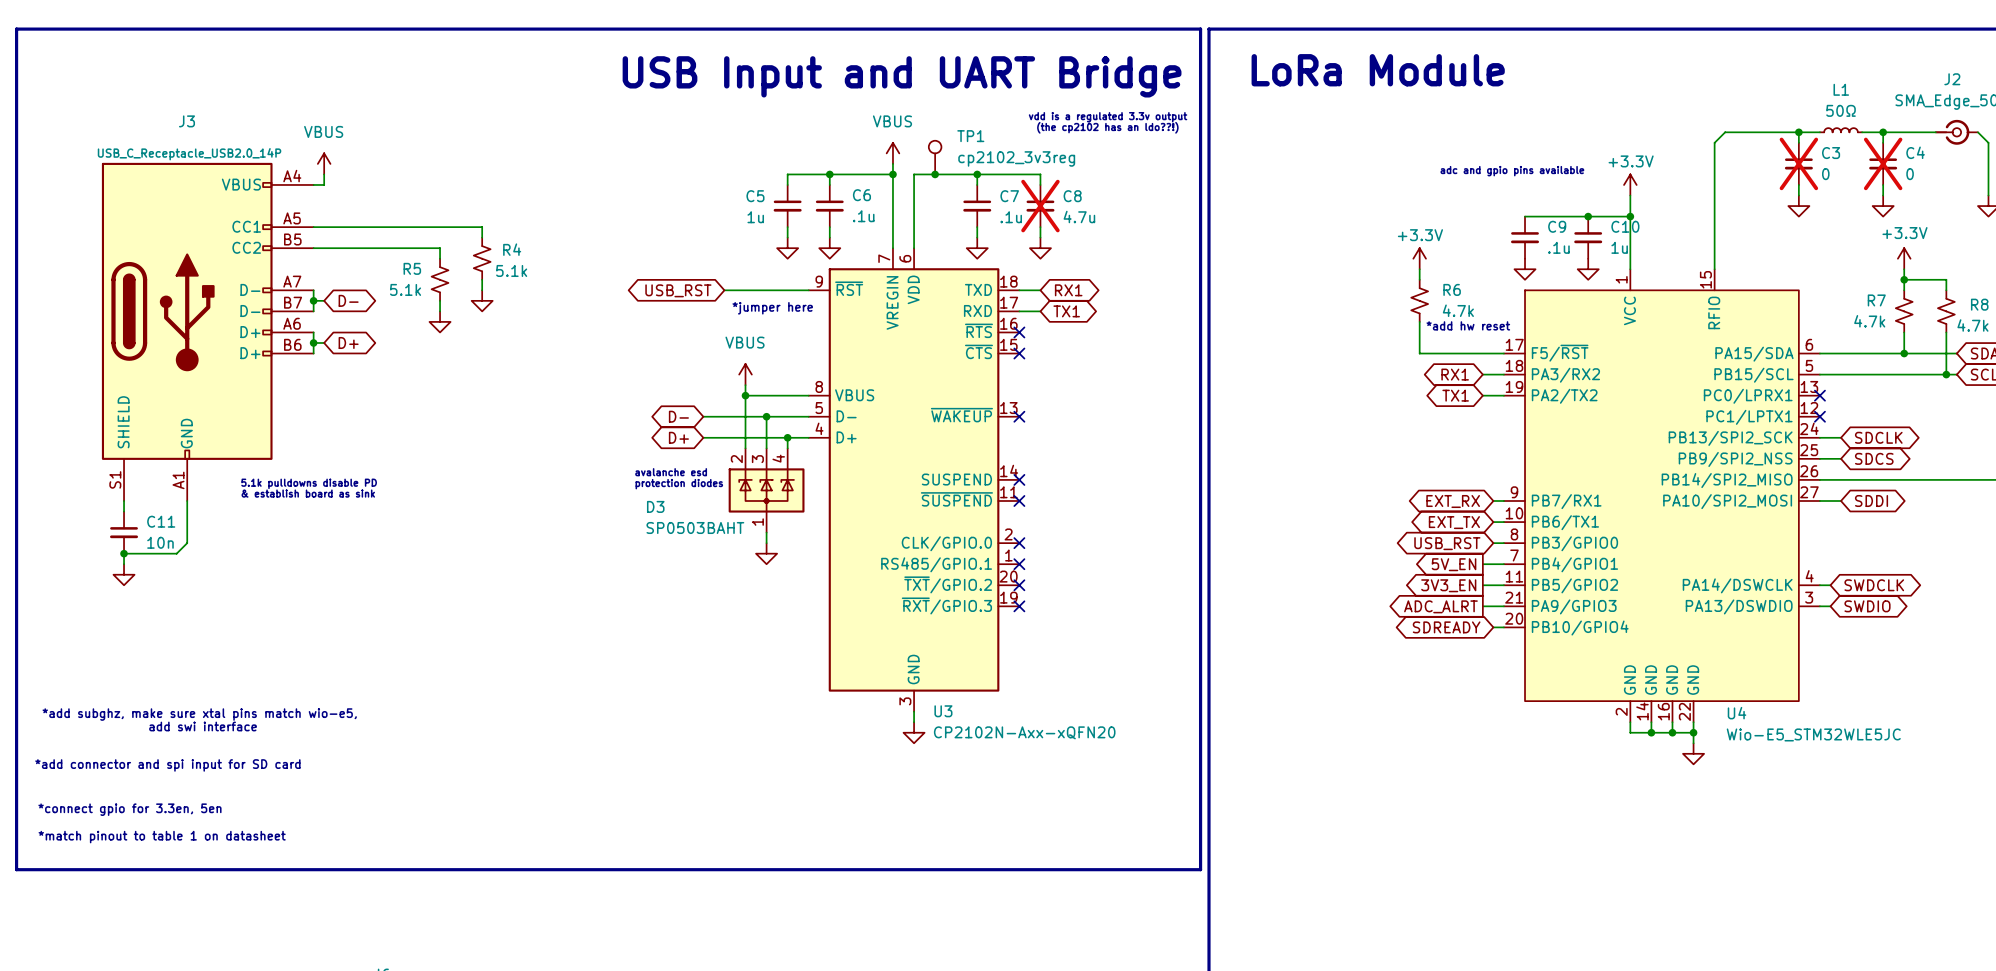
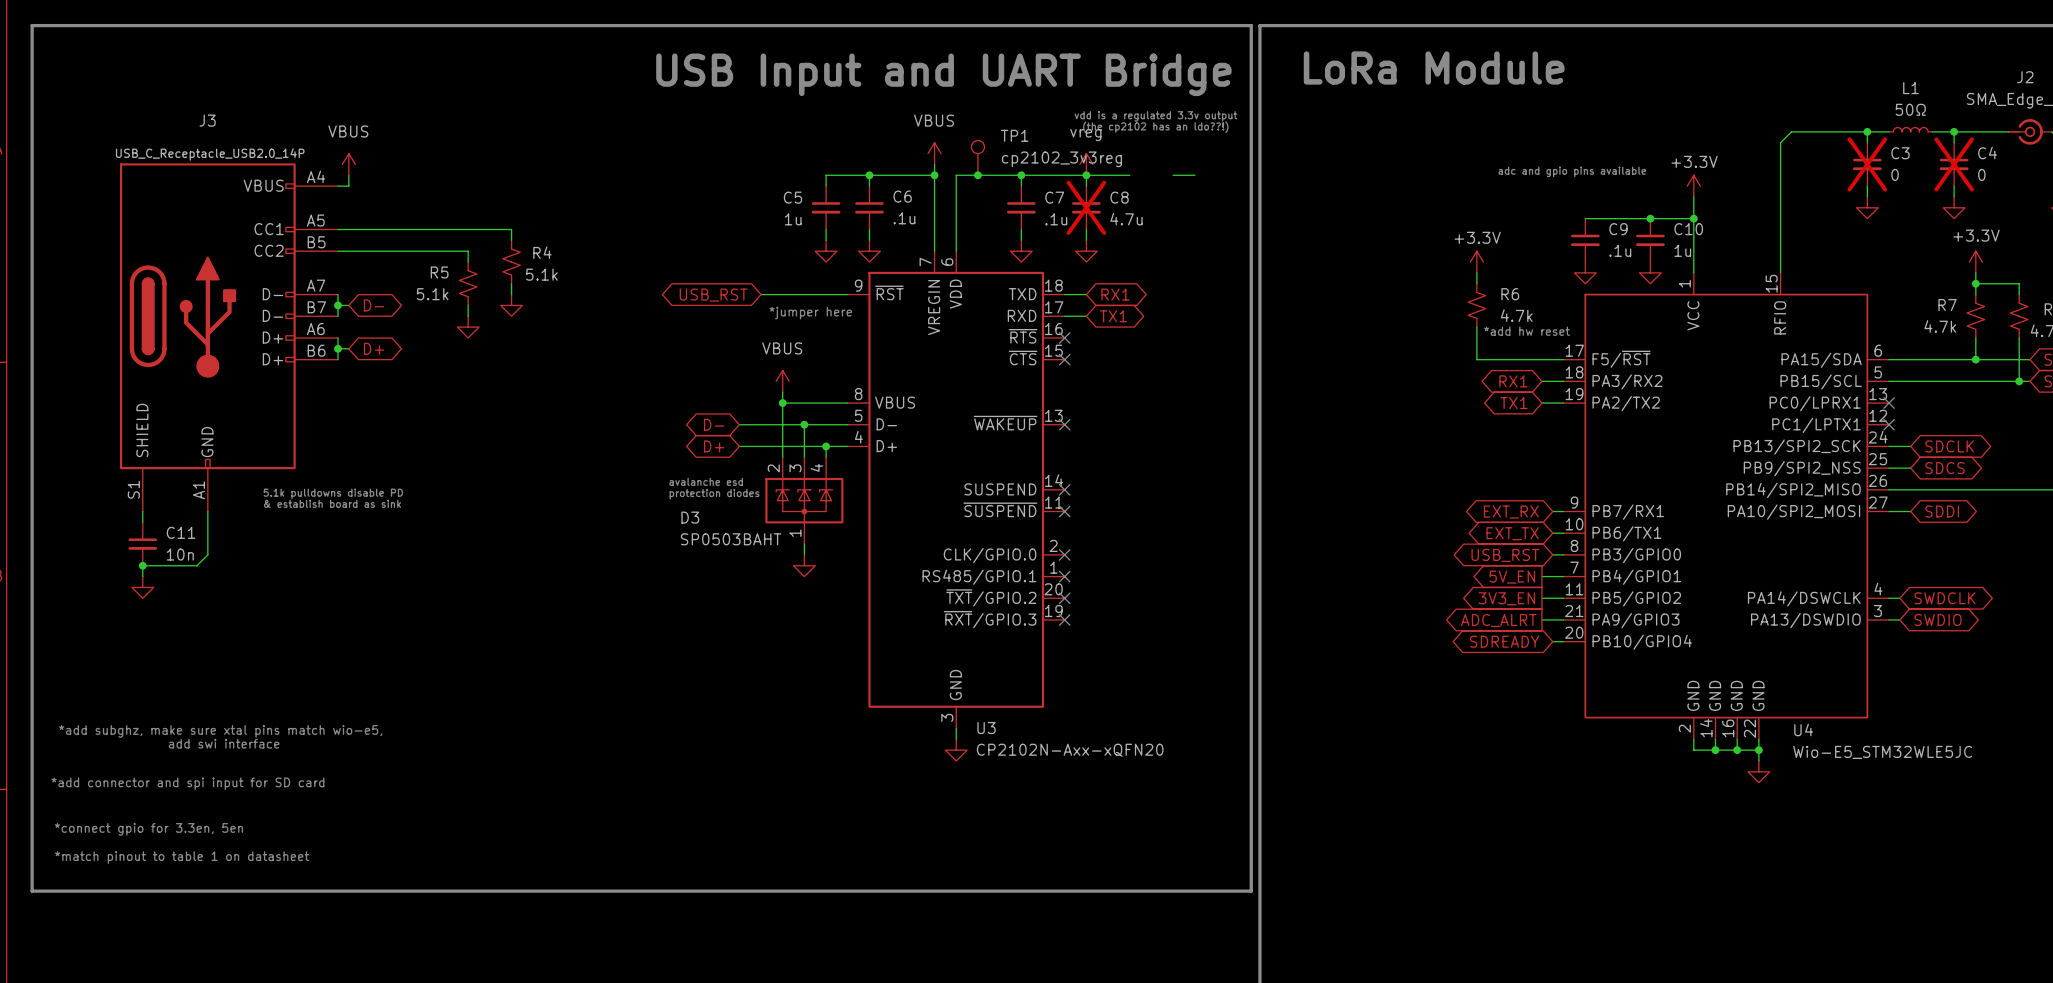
power symbol: none -> vreg (1086, 164)
wire: none -> (1086, 175) (1129, 175)
junction: none -> (1086, 175)
wire: none -> (1173, 175) (1194, 175)

